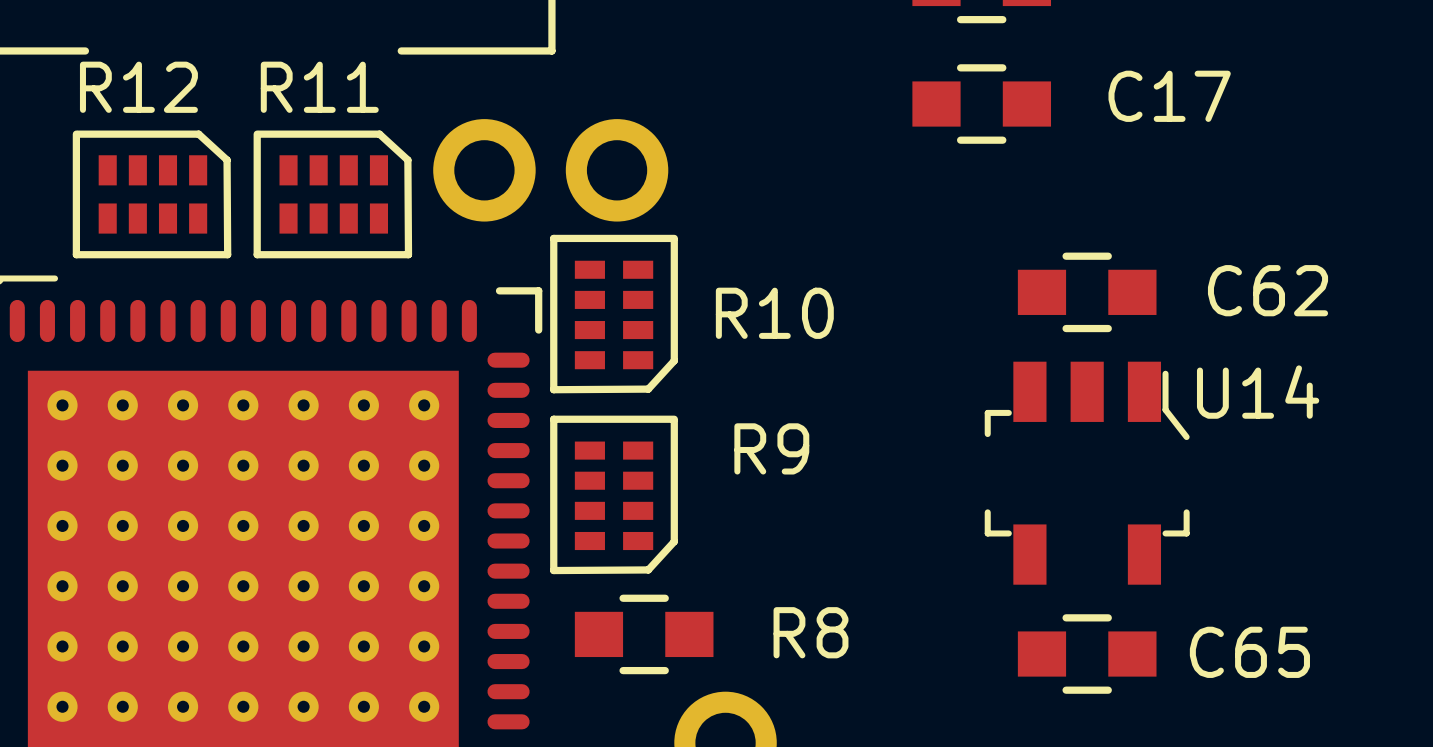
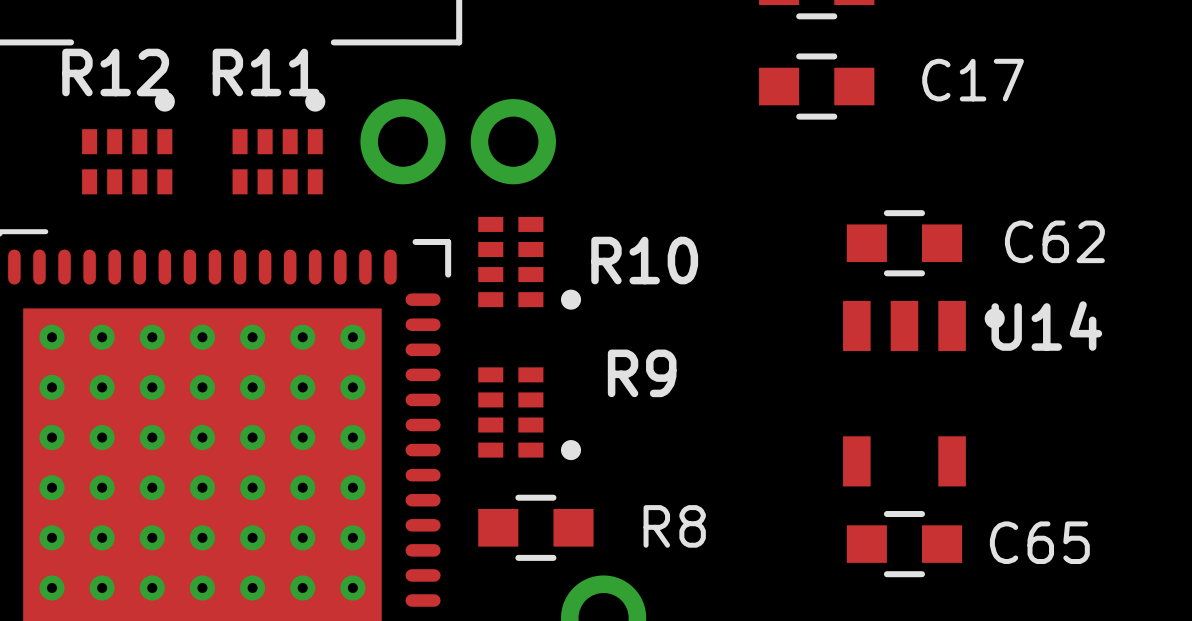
R12 footprint: [72, 130, 232, 259] -> [82, 91, 175, 195]
R11 footprint: [253, 130, 413, 259] -> [232, 91, 326, 195]
R10 footprint: [550, 234, 678, 394] -> [478, 216, 582, 310]
U14 footprint: [984, 361, 1190, 585] -> [843, 300, 1005, 487]
R9 footprint: [550, 415, 678, 575] -> [478, 367, 582, 461]

